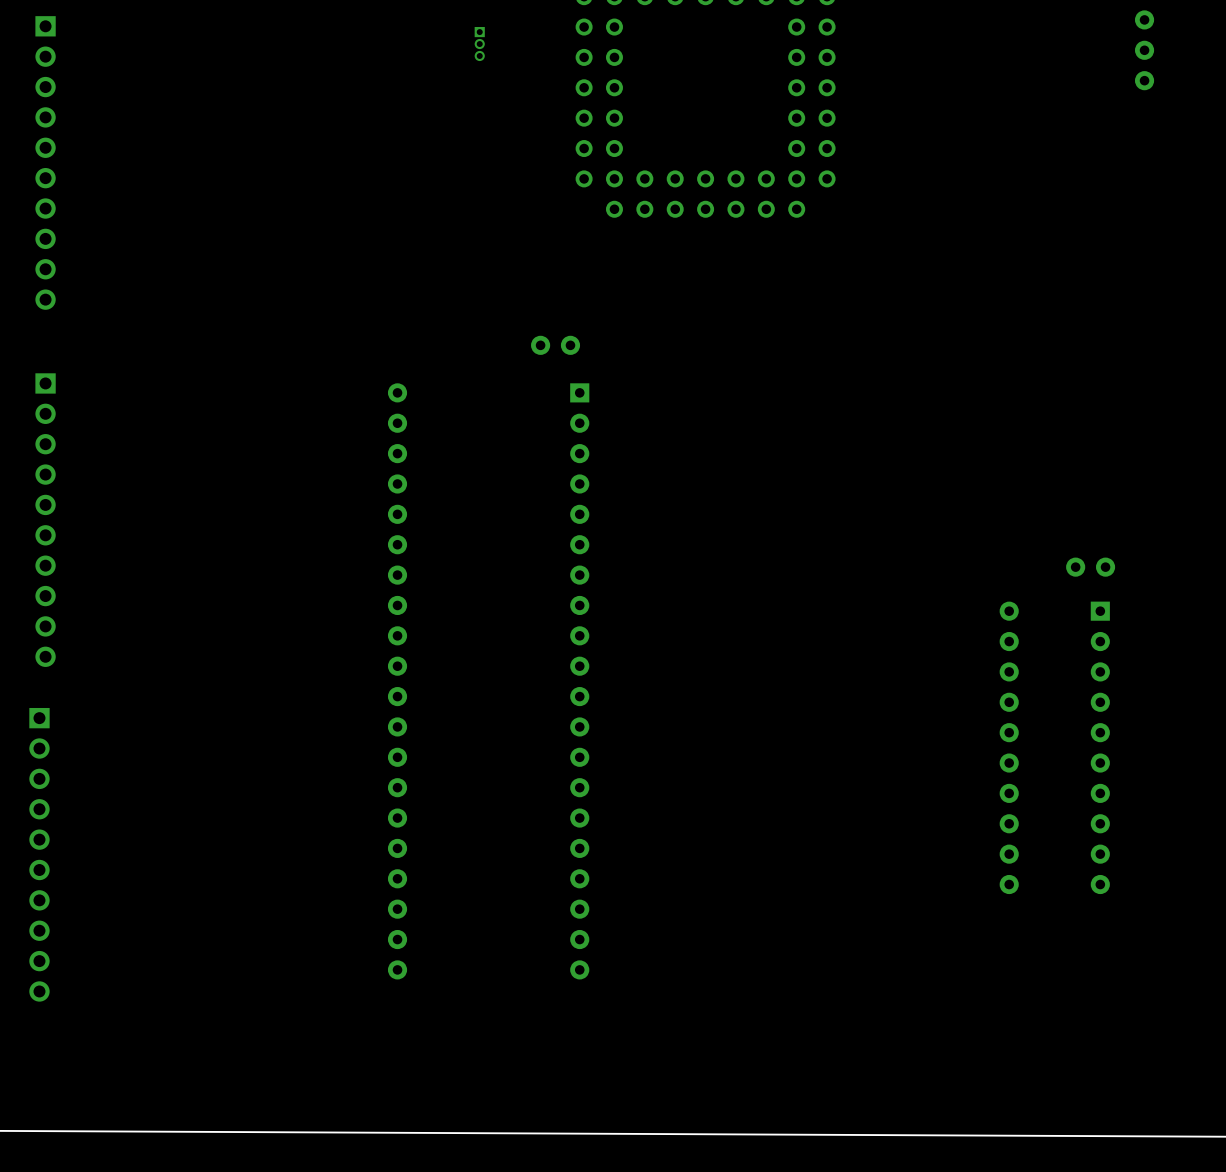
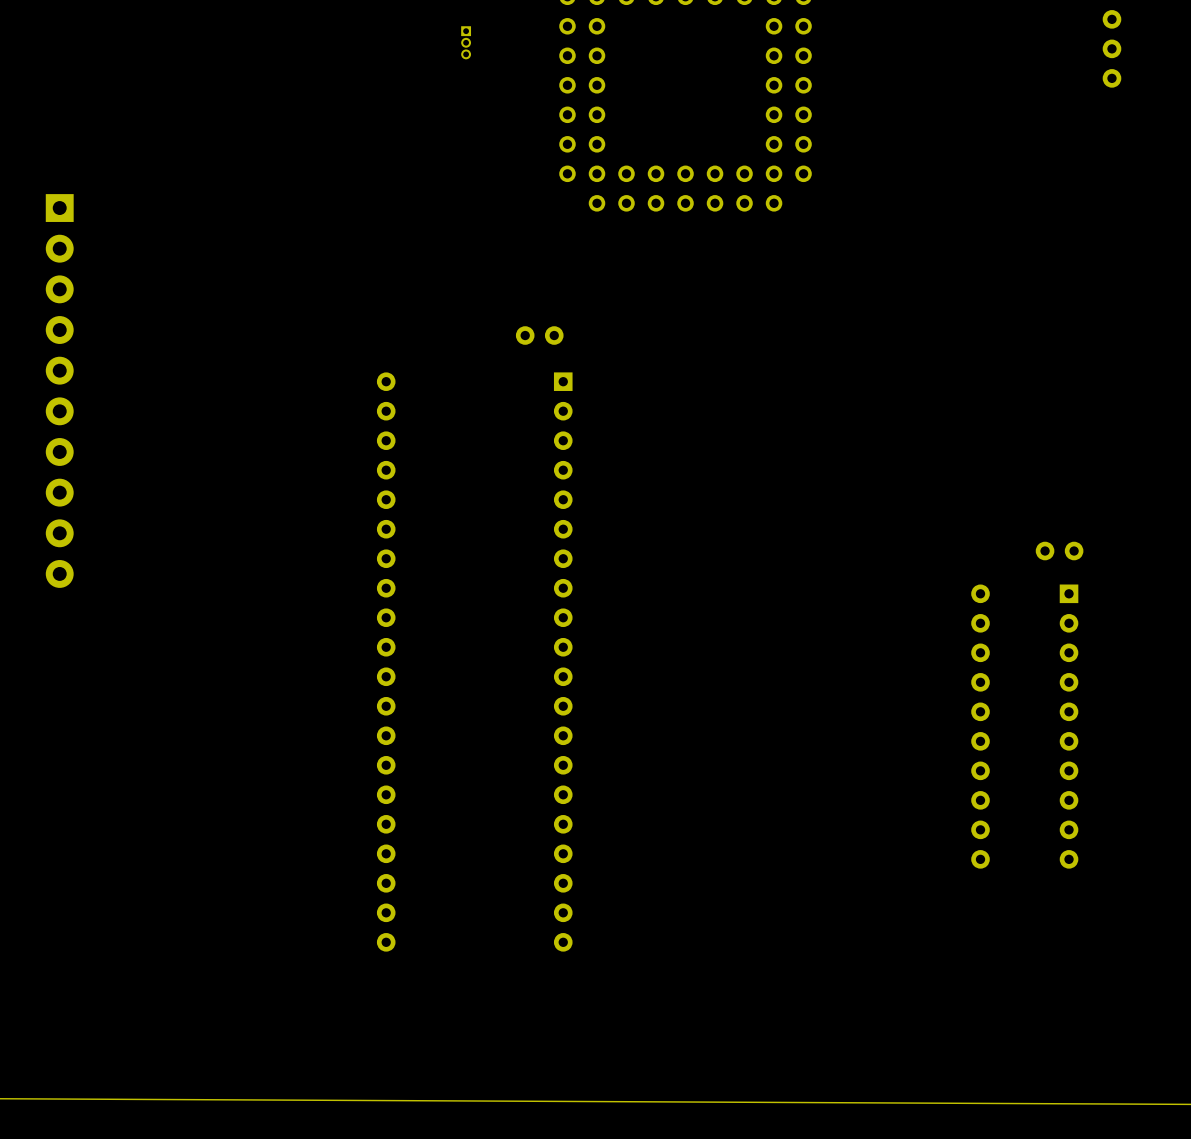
part: (45, 162) -> none
part: none -> (59, 390)
part: (45, 520) -> none
part: (39, 854) -> none

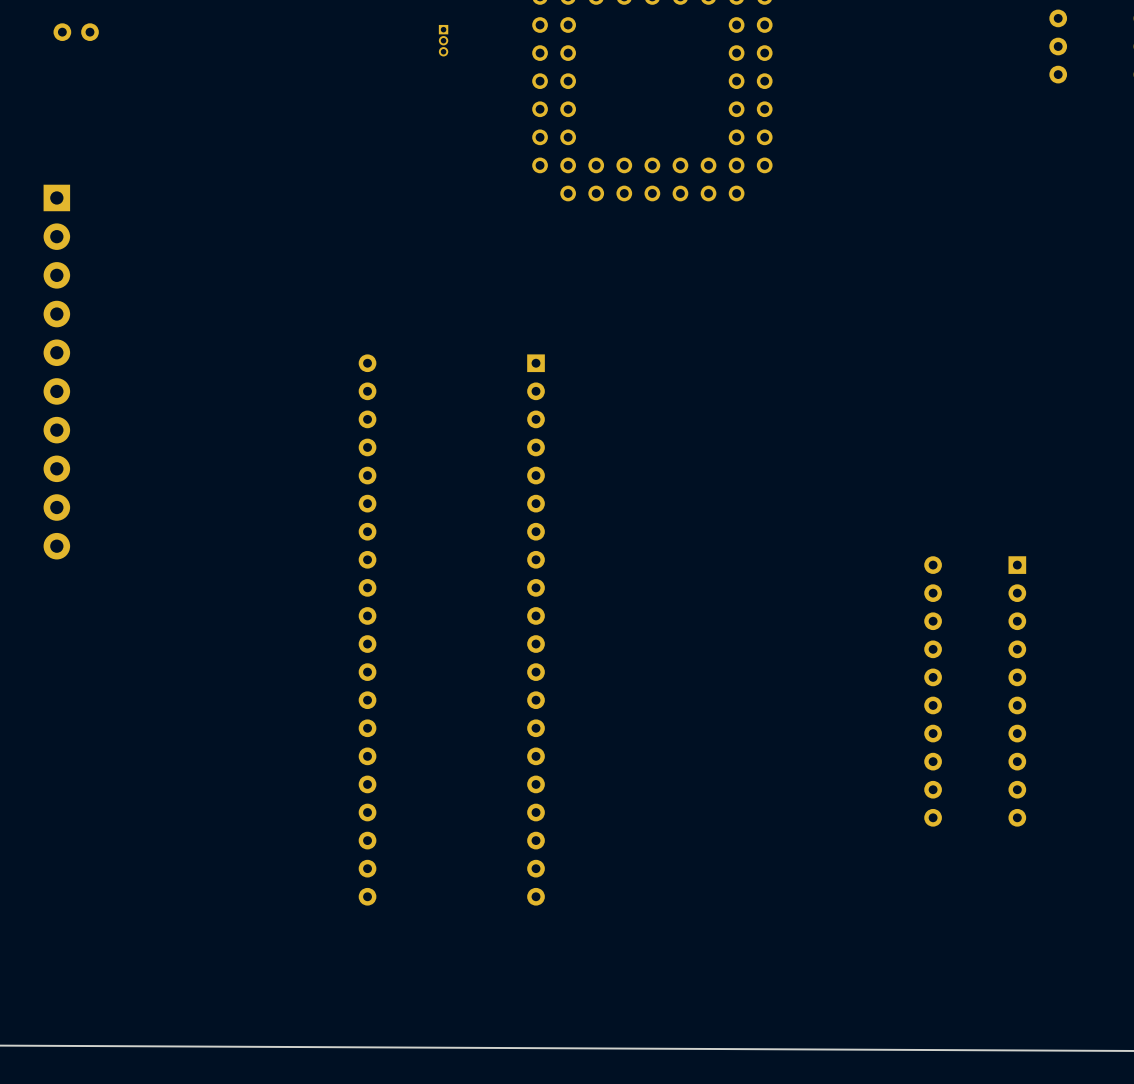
part: none -> (76, 32)
part: (539, 335) -> none
part: (1059, 551) -> none

